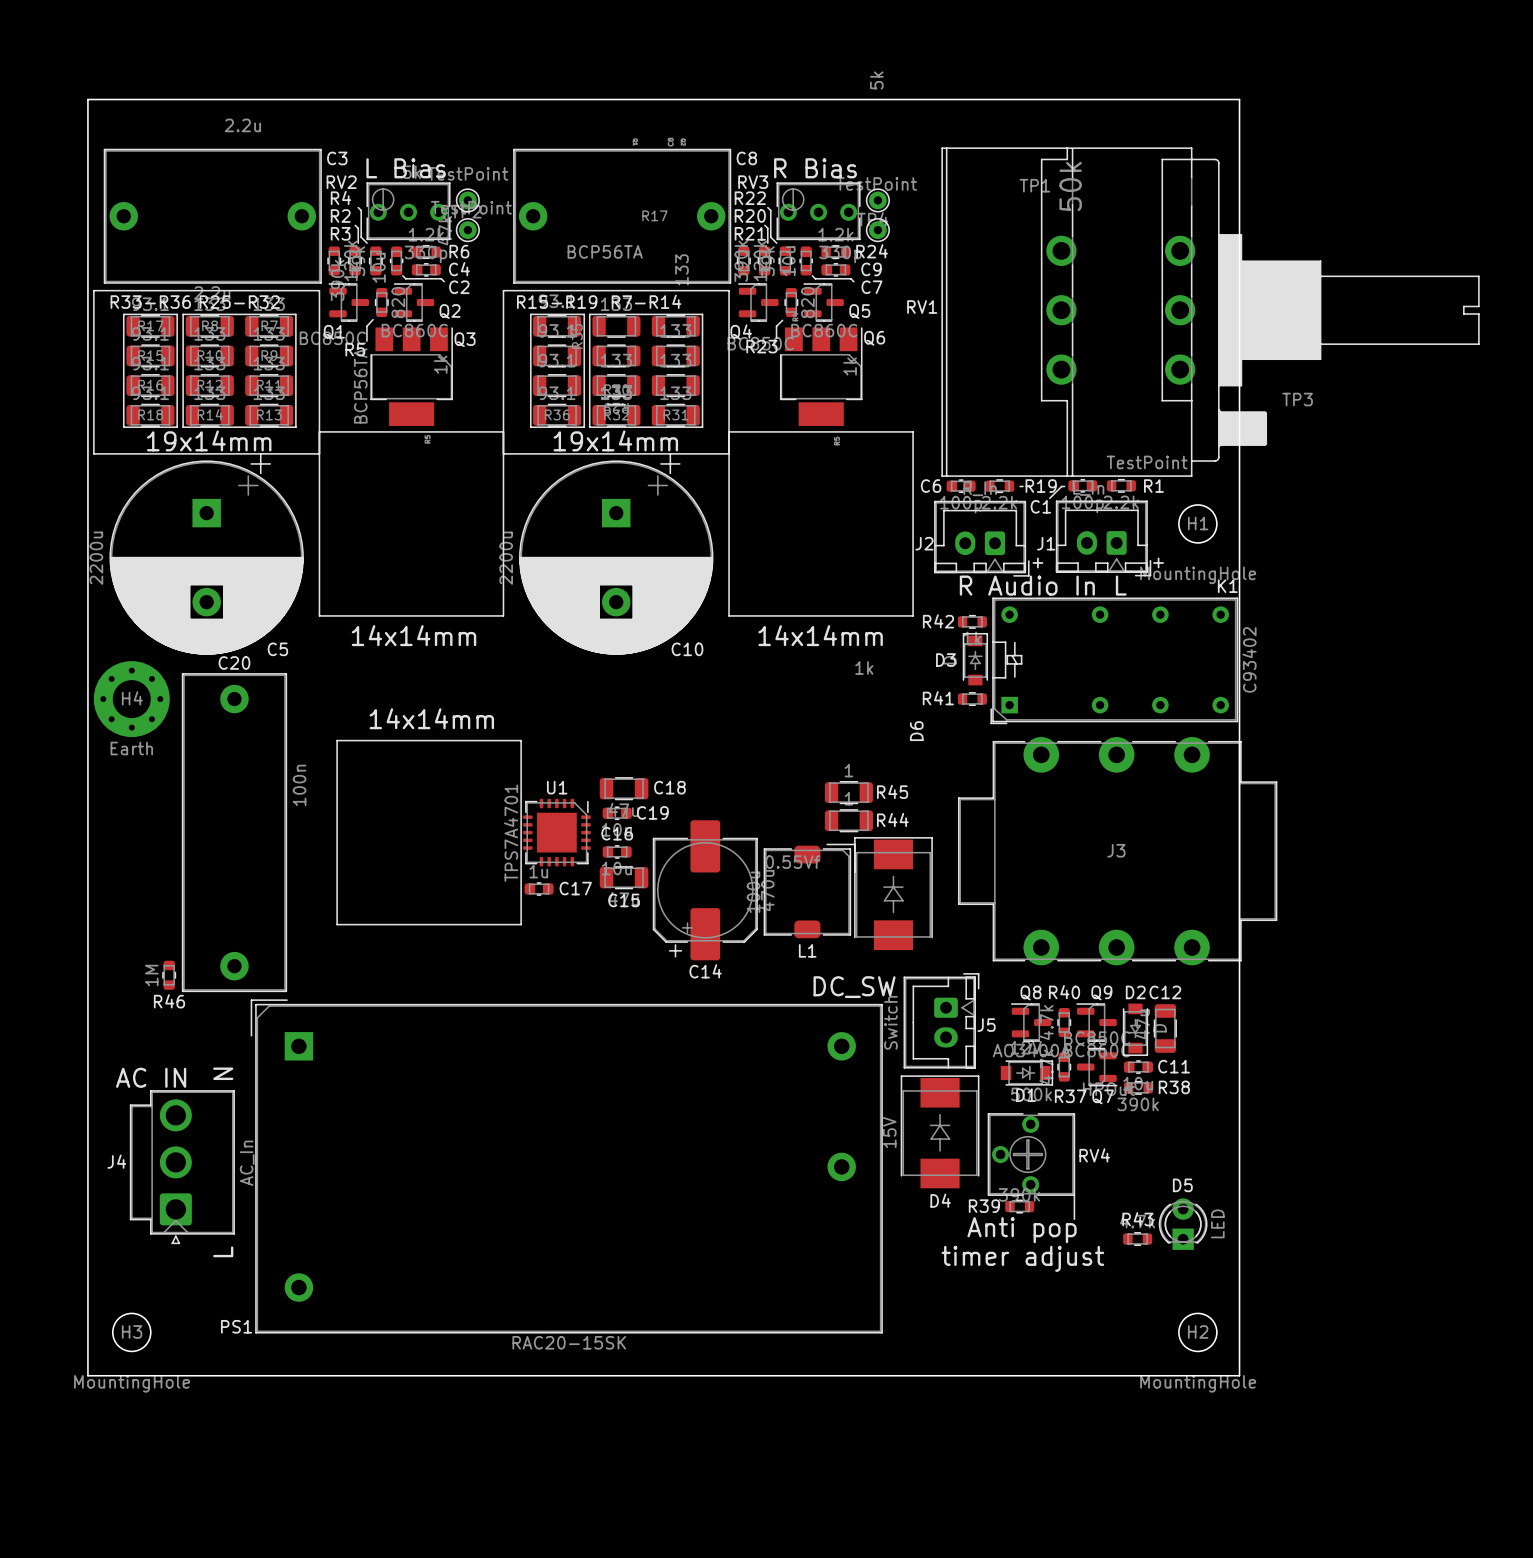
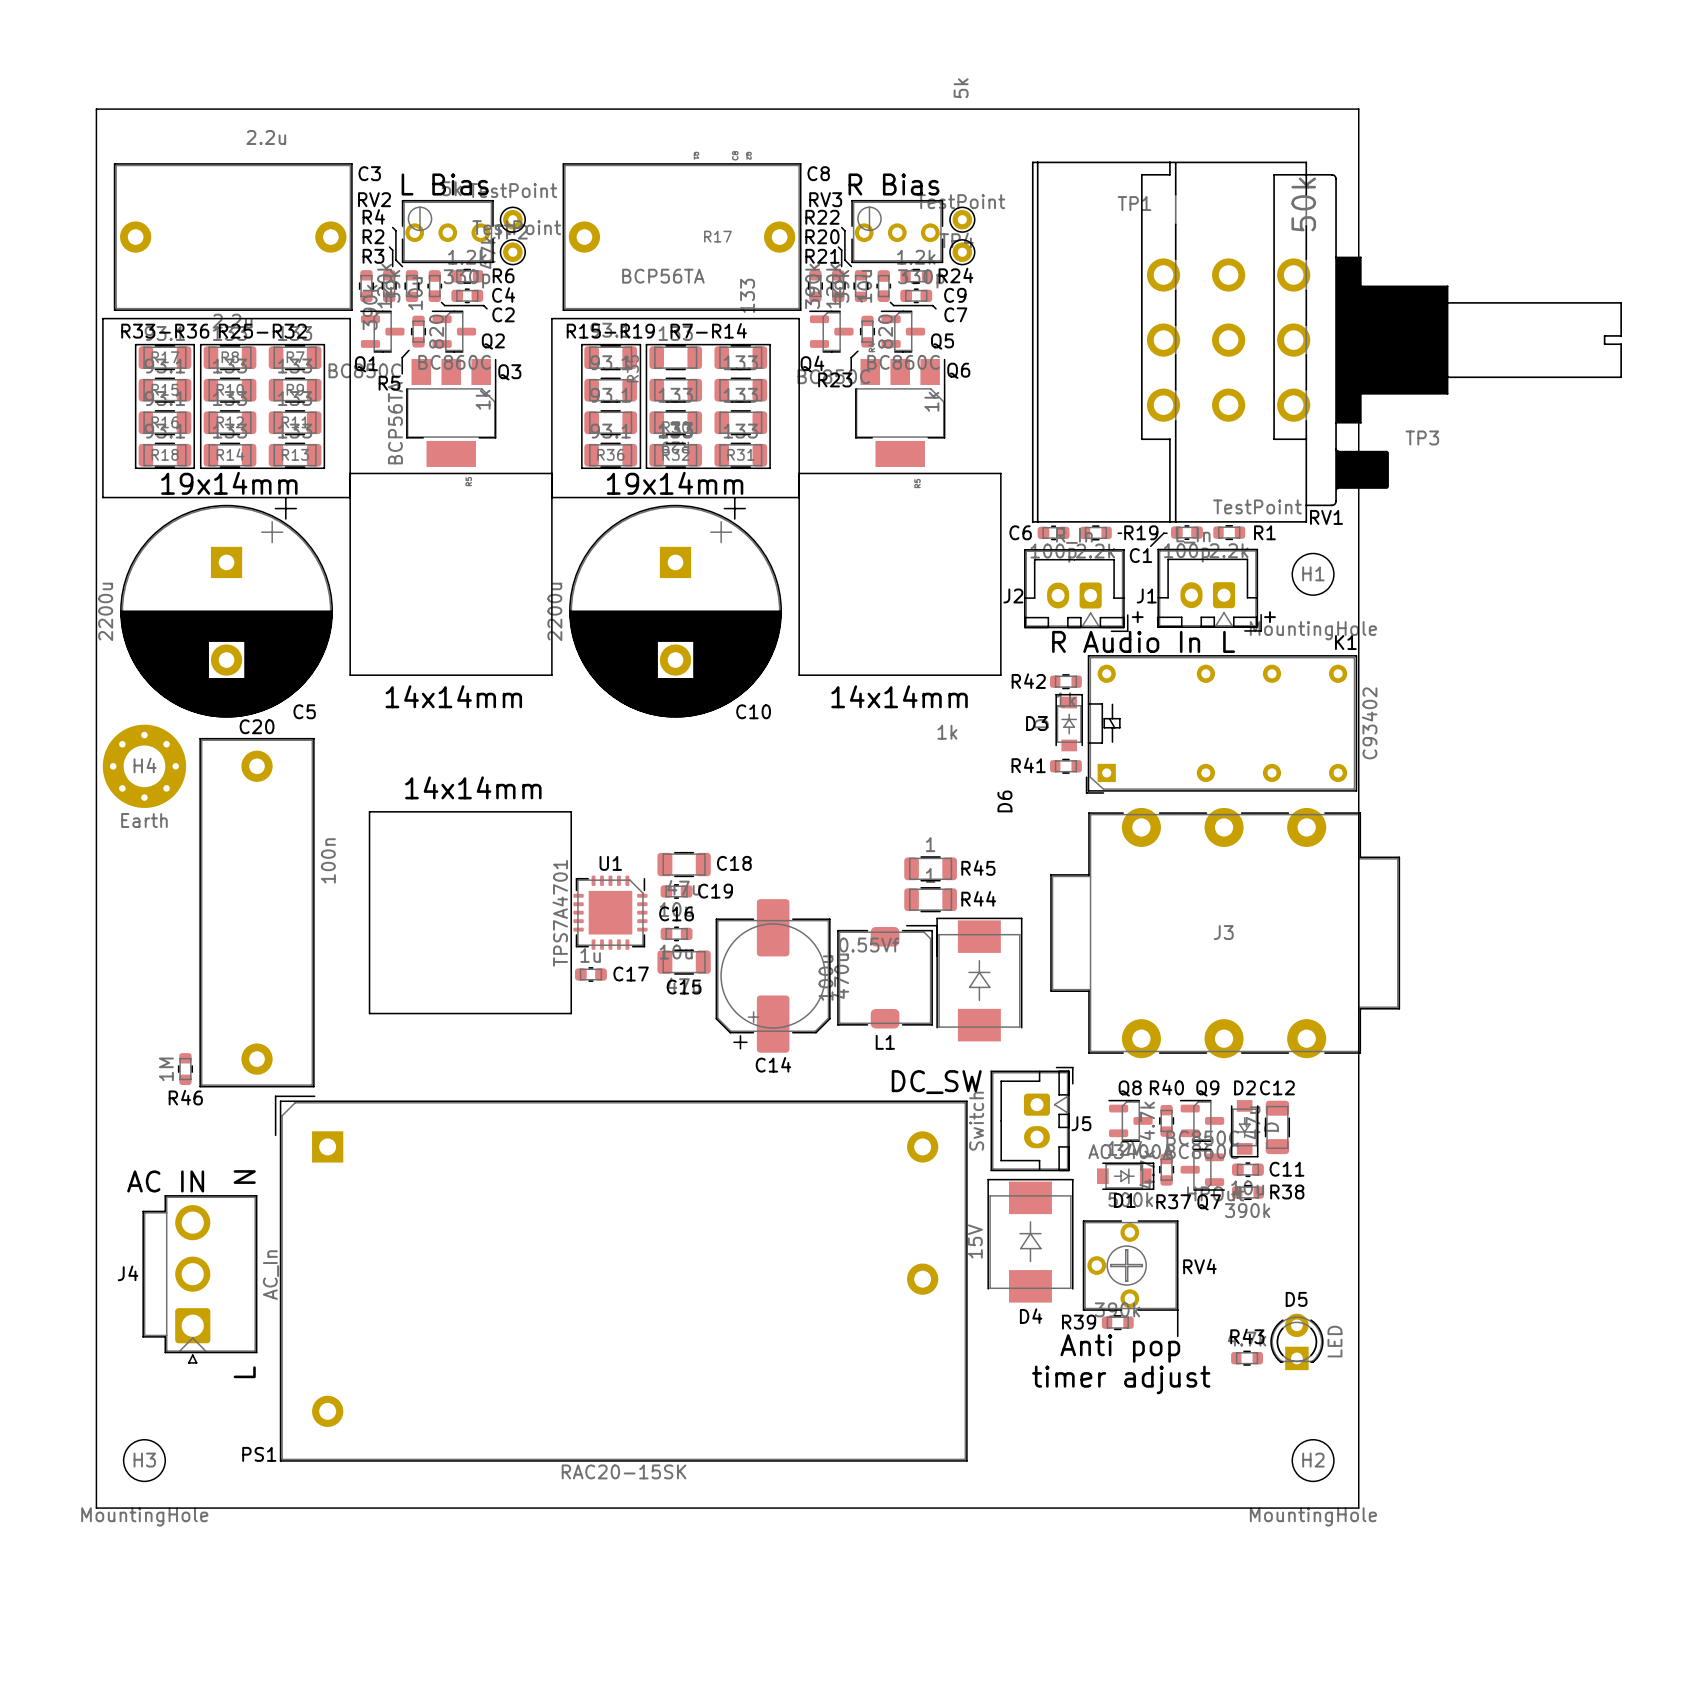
RV1 footprint: [941, 147, 1480, 477] -> [1031, 161, 1622, 523]
RV1 value position: 50k (1070, 186) -> 50k (1303, 204)
RV1 name position: RV1 (922, 307) -> RV1 (1326, 517)

